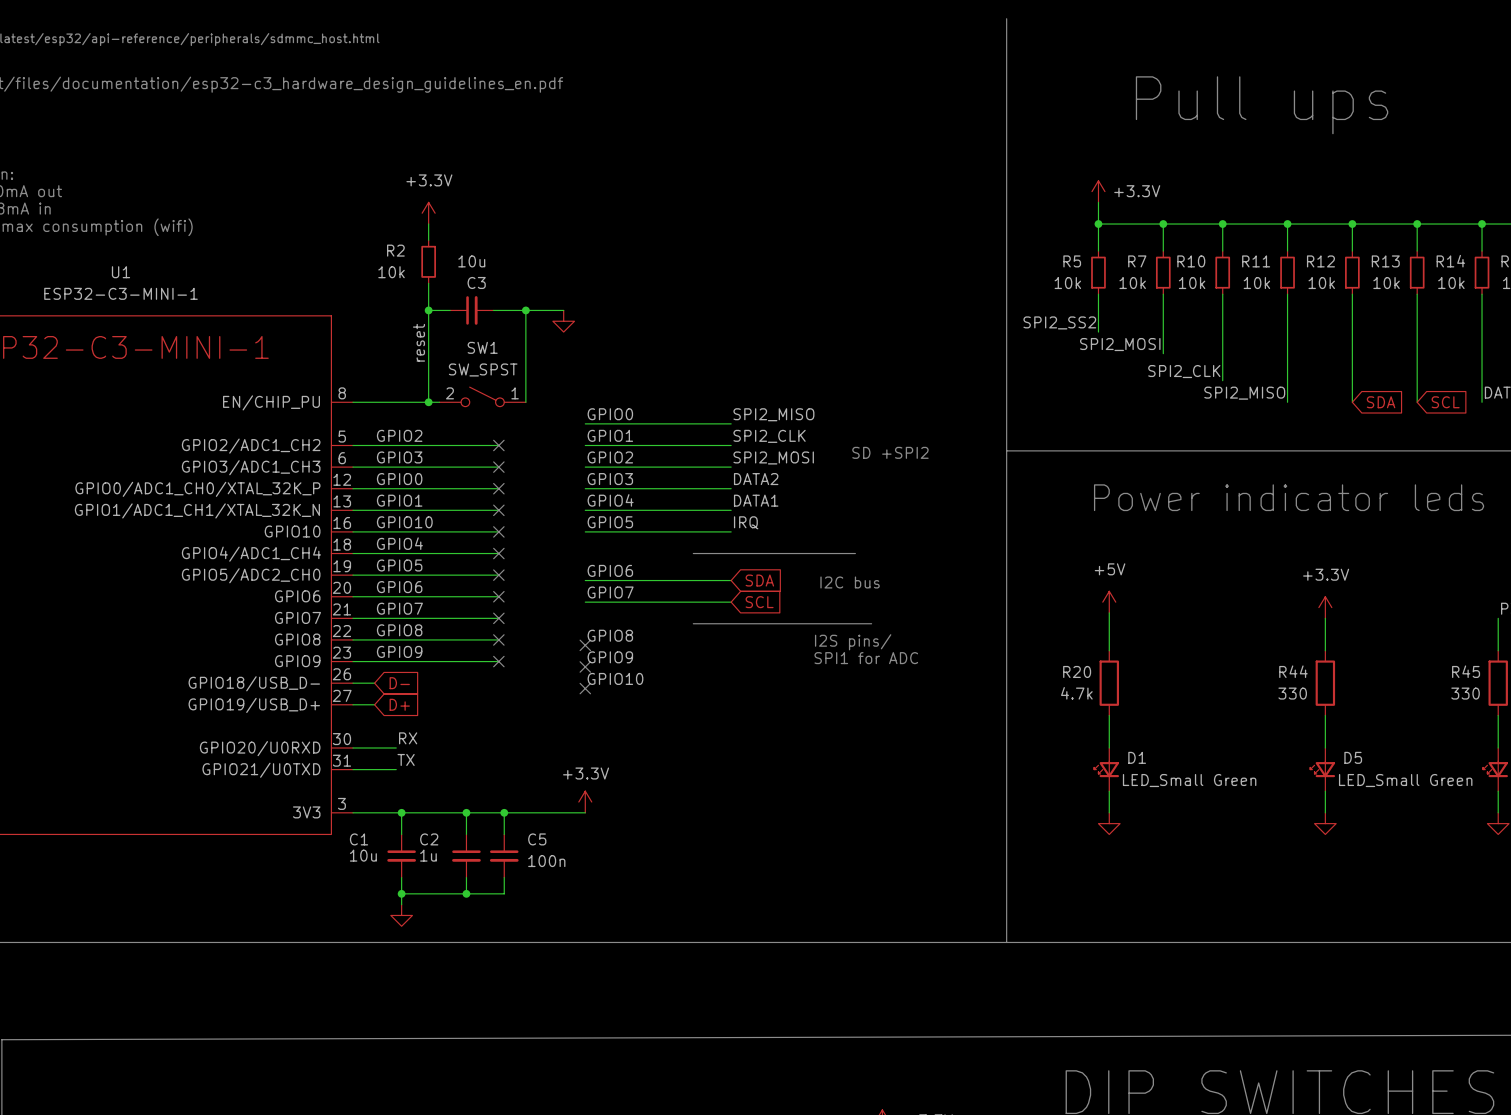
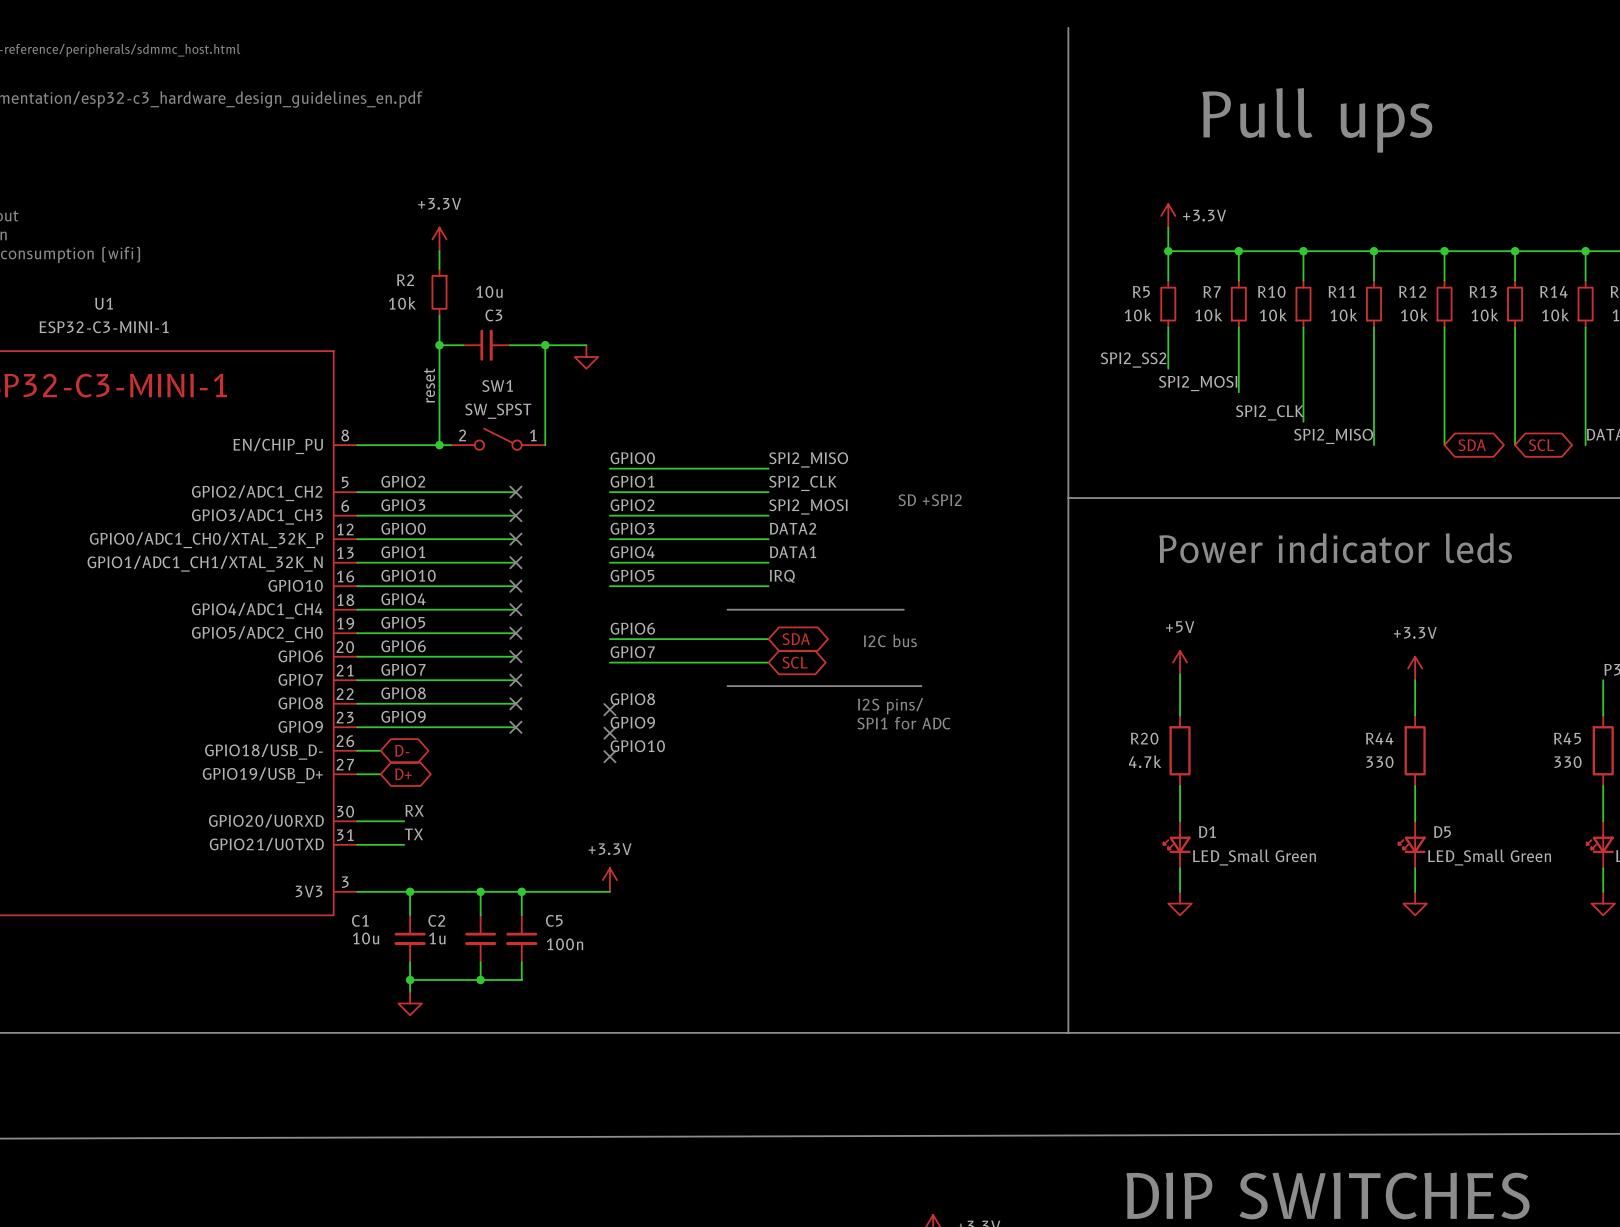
global label shape: input (1381, 402) -> bidirectional (1472, 445)
global label shape: input (1445, 402) -> bidirectional (1541, 445)
global label shape: input (759, 580) -> bidirectional (796, 639)
global label shape: input (759, 602) -> bidirectional (795, 662)
global label shape: input (399, 683) -> bidirectional (402, 750)
global label shape: input (399, 704) -> bidirectional (403, 774)

